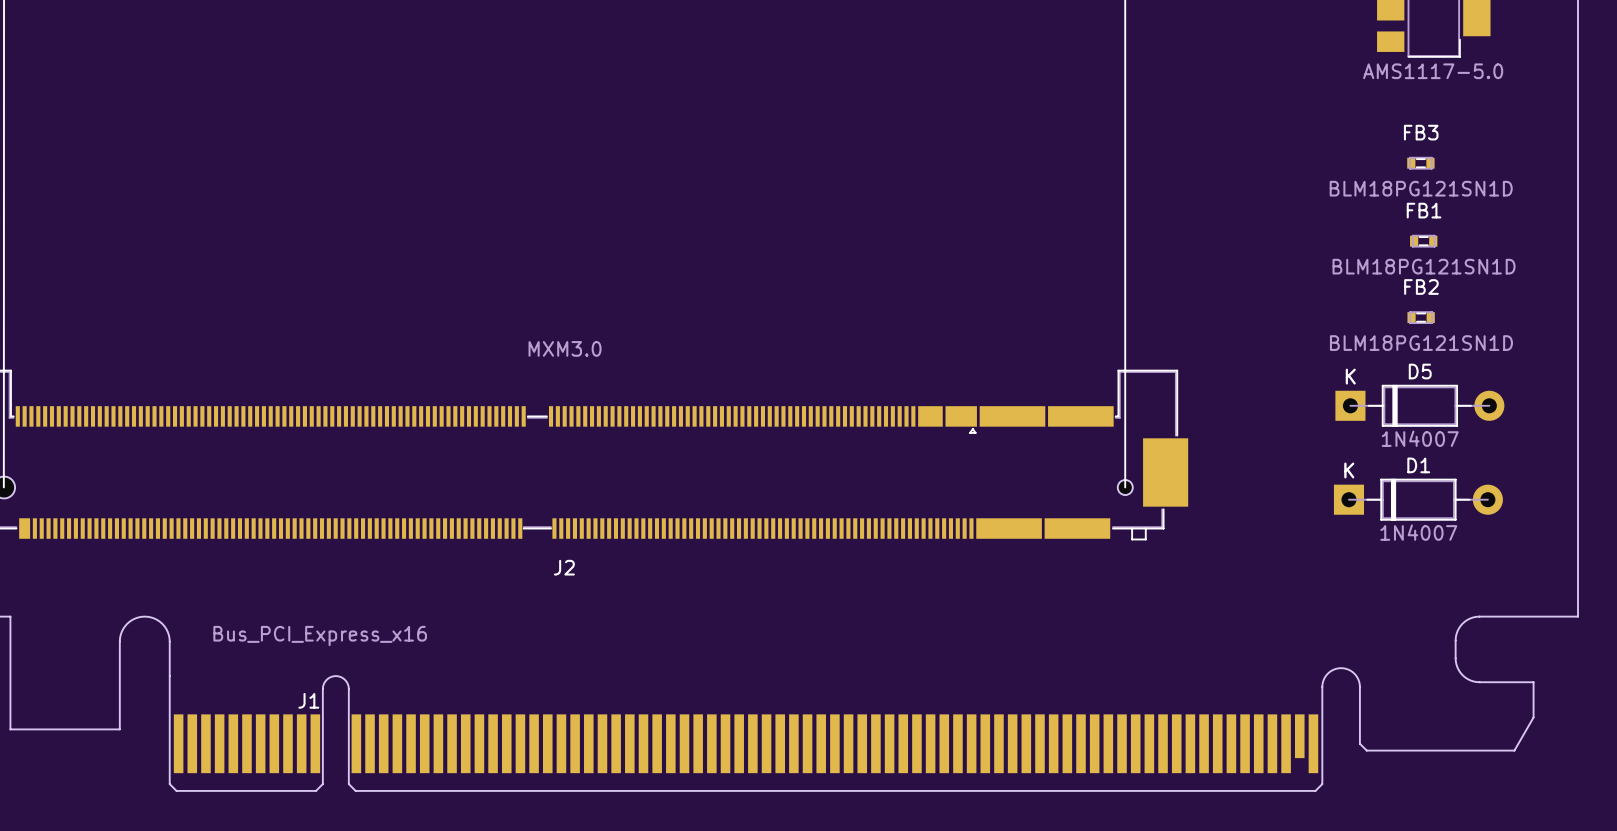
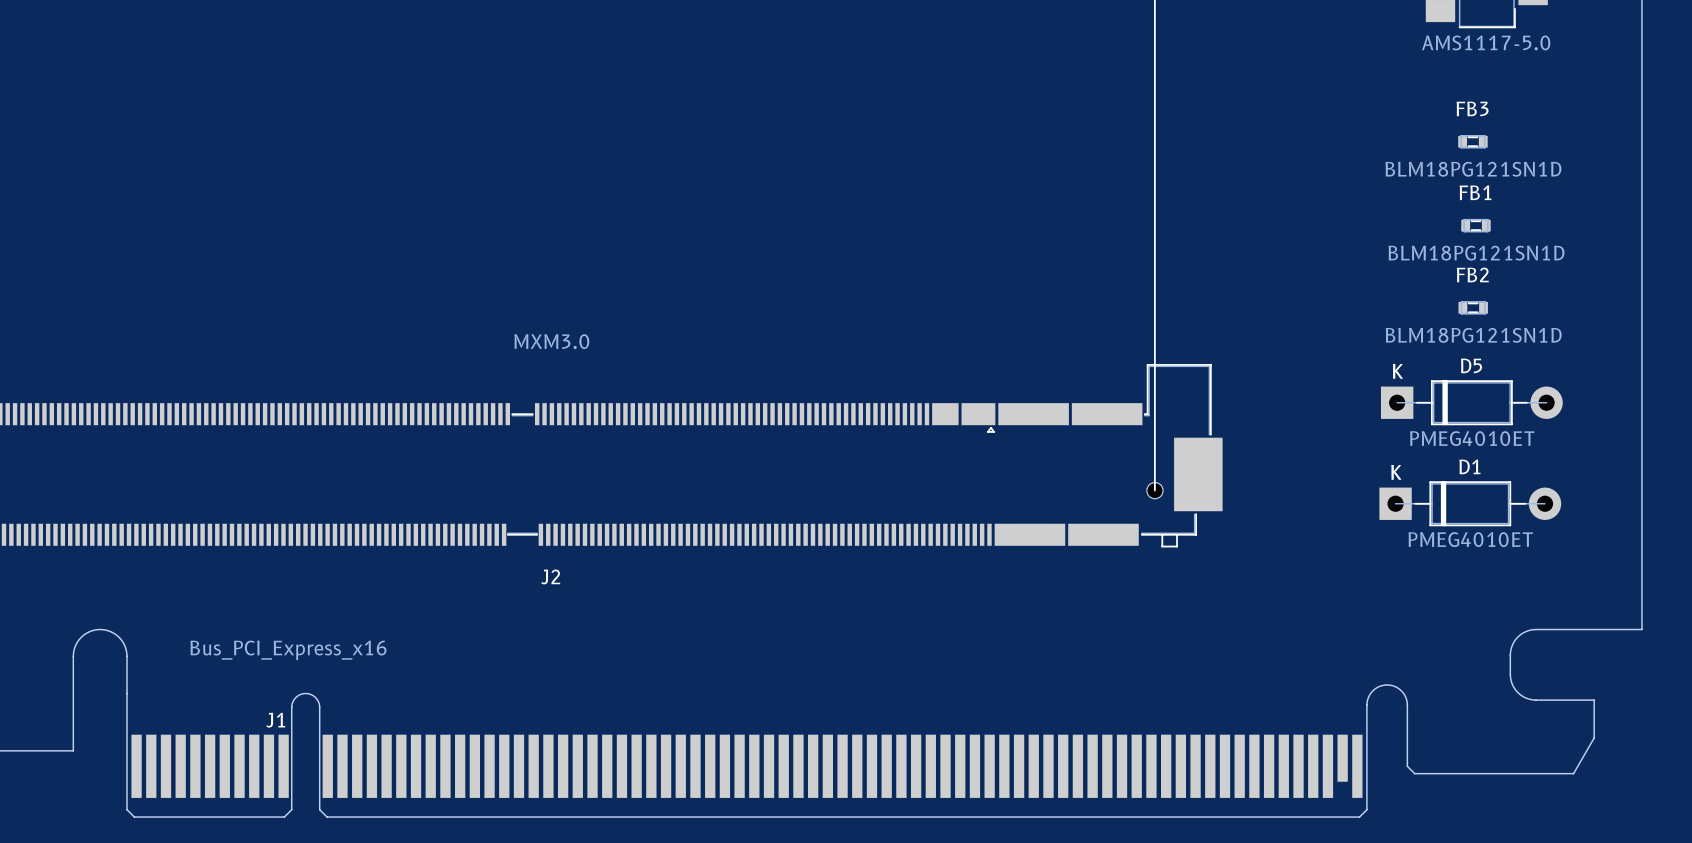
D5 value: 1N4007 (1420, 438) -> PMEG4010ET (1472, 438)
D1 value: 1N4007 (1418, 532) -> PMEG4010ET (1470, 539)

